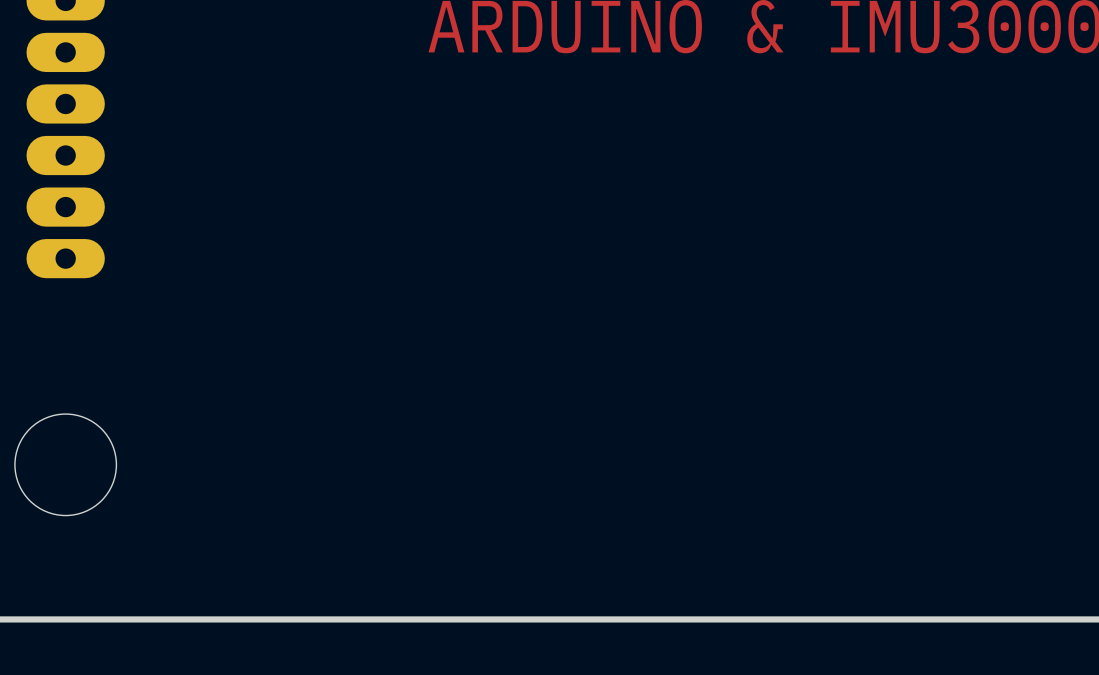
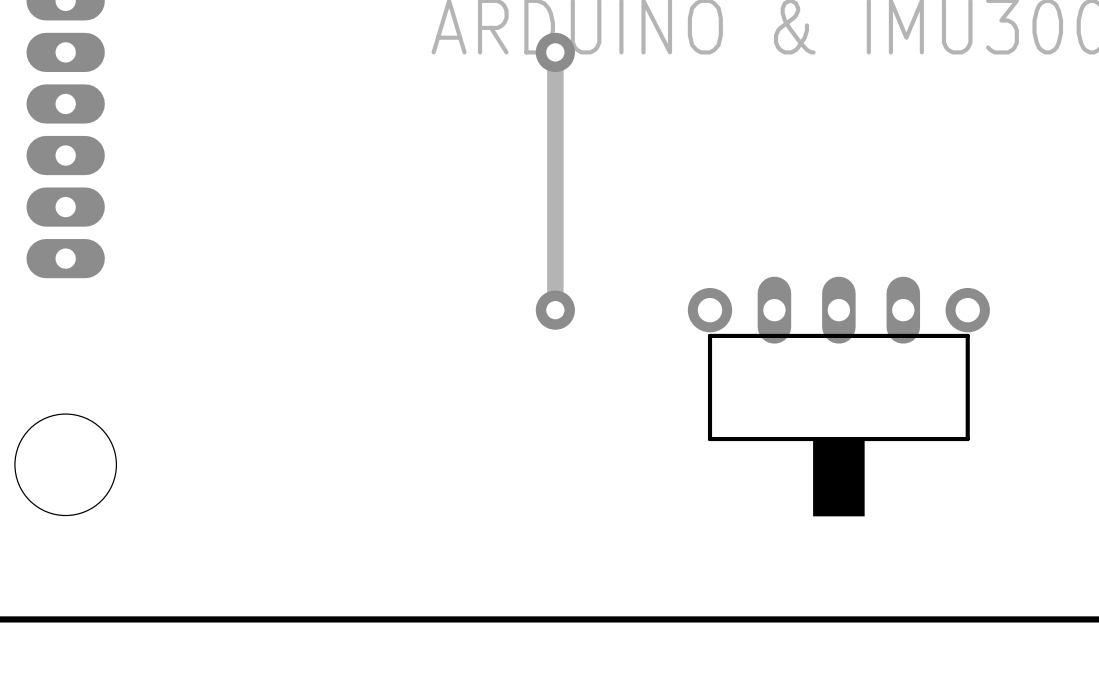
track: none -> (555, 52) (555, 310)
via: none -> (555, 52)
via: none -> (555, 310)
part: none -> (838, 396)

